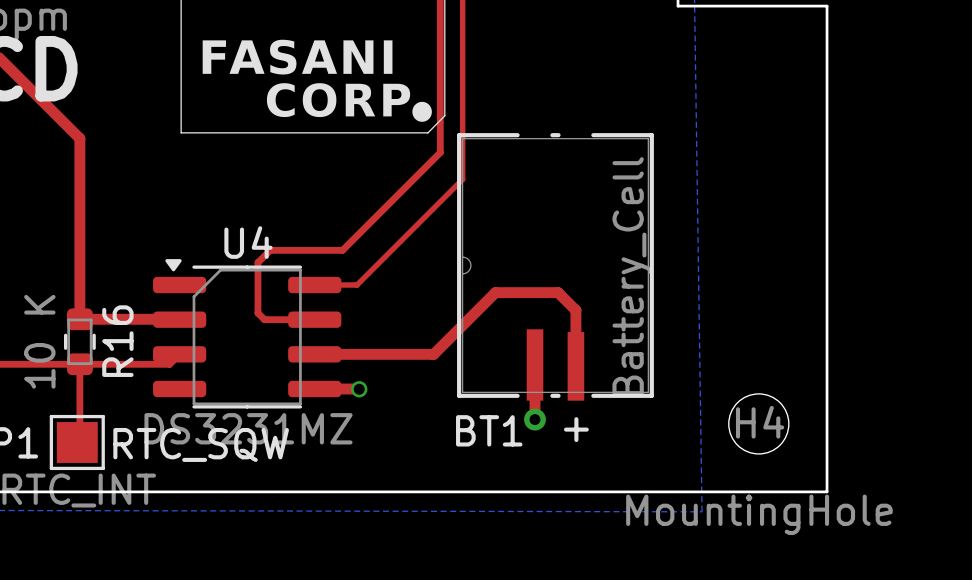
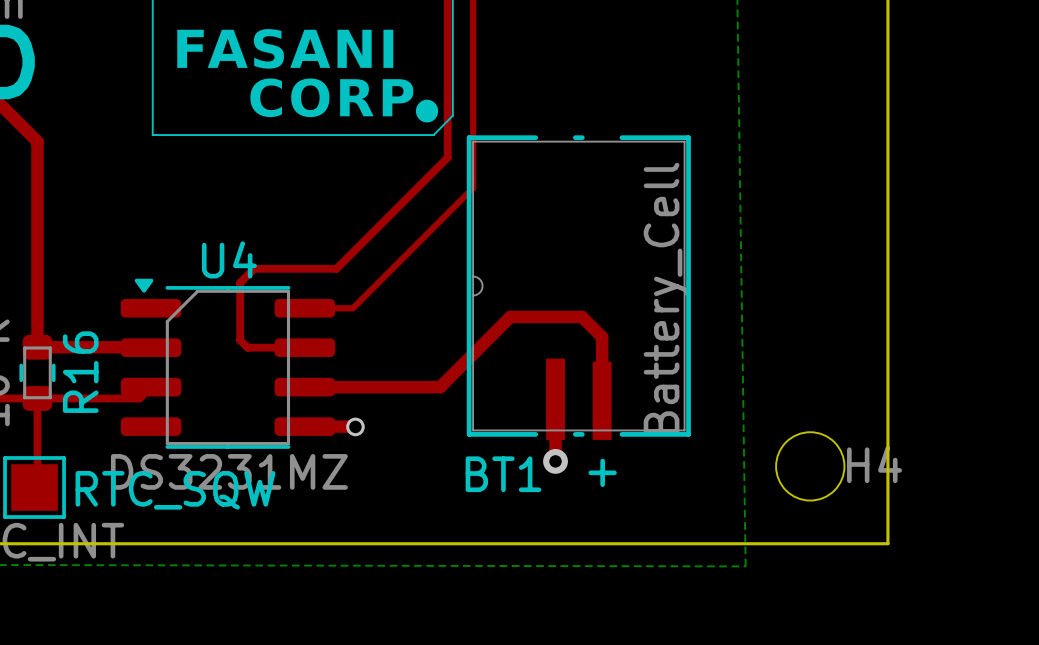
H4 name position: H4 (760, 422) -> H4 (874, 464)
H4 value: MountingHole (759, 514) -> none

